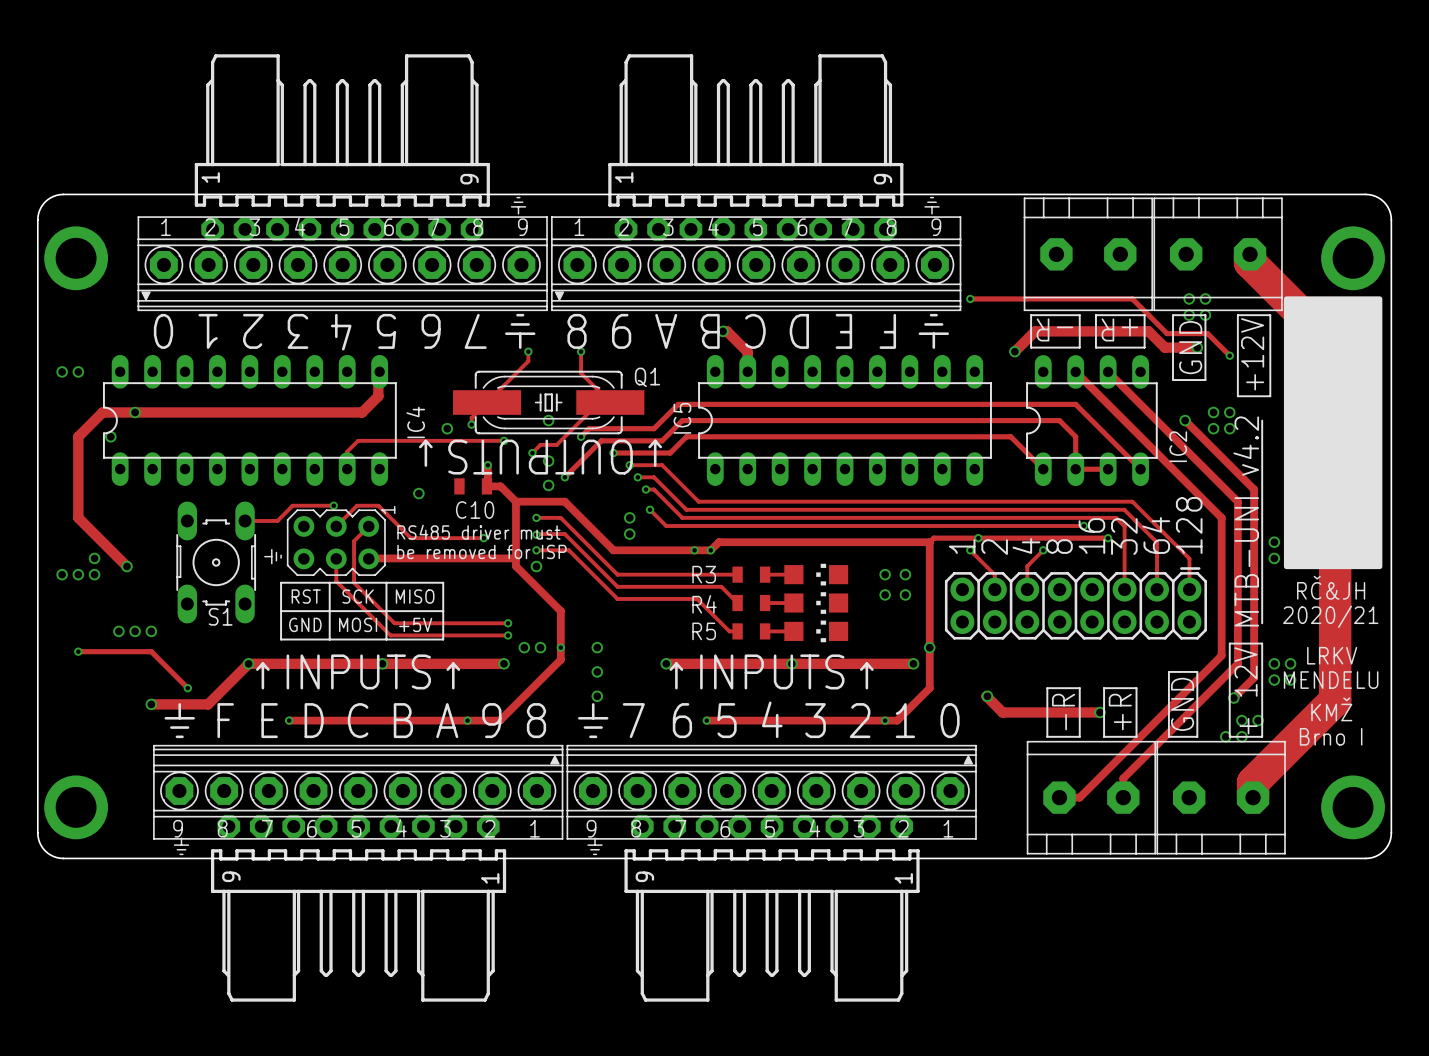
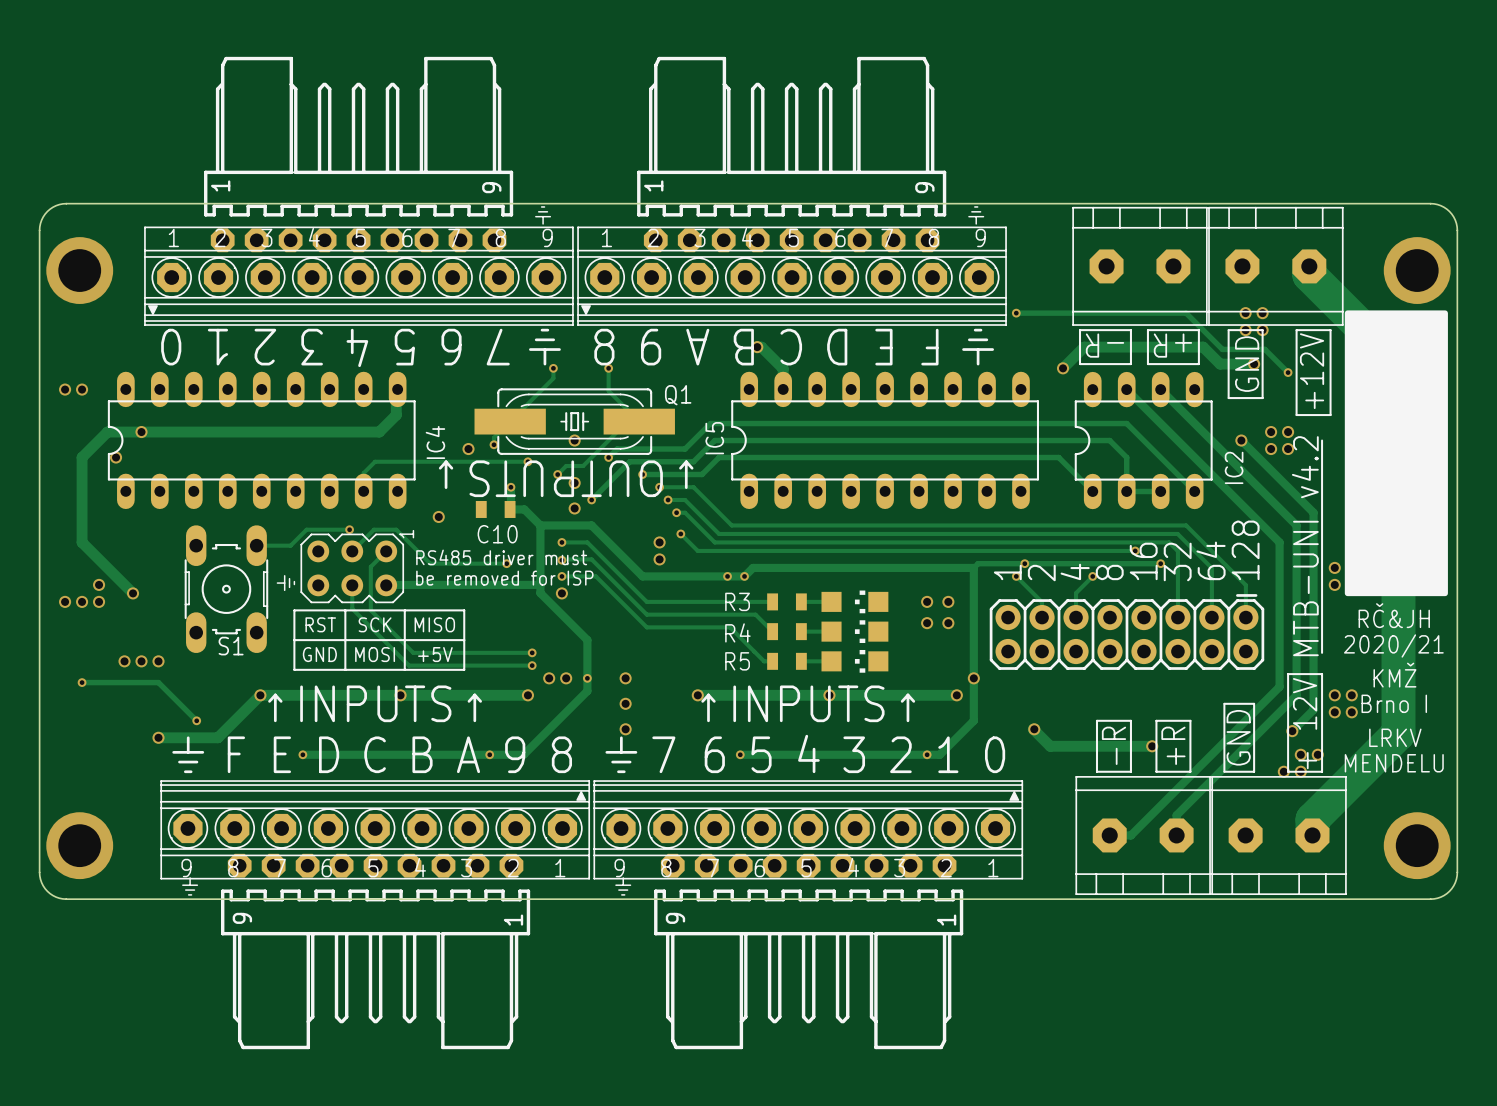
text position: LRKV (1332, 655) -> LRKV (1395, 737)
text position: MENDELU (1331, 680) -> MENDELU (1394, 763)
text position: KMŽ (1331, 709) -> KMŽ (1394, 675)
text position: Brno I (1331, 736) -> Brno I (1394, 703)

